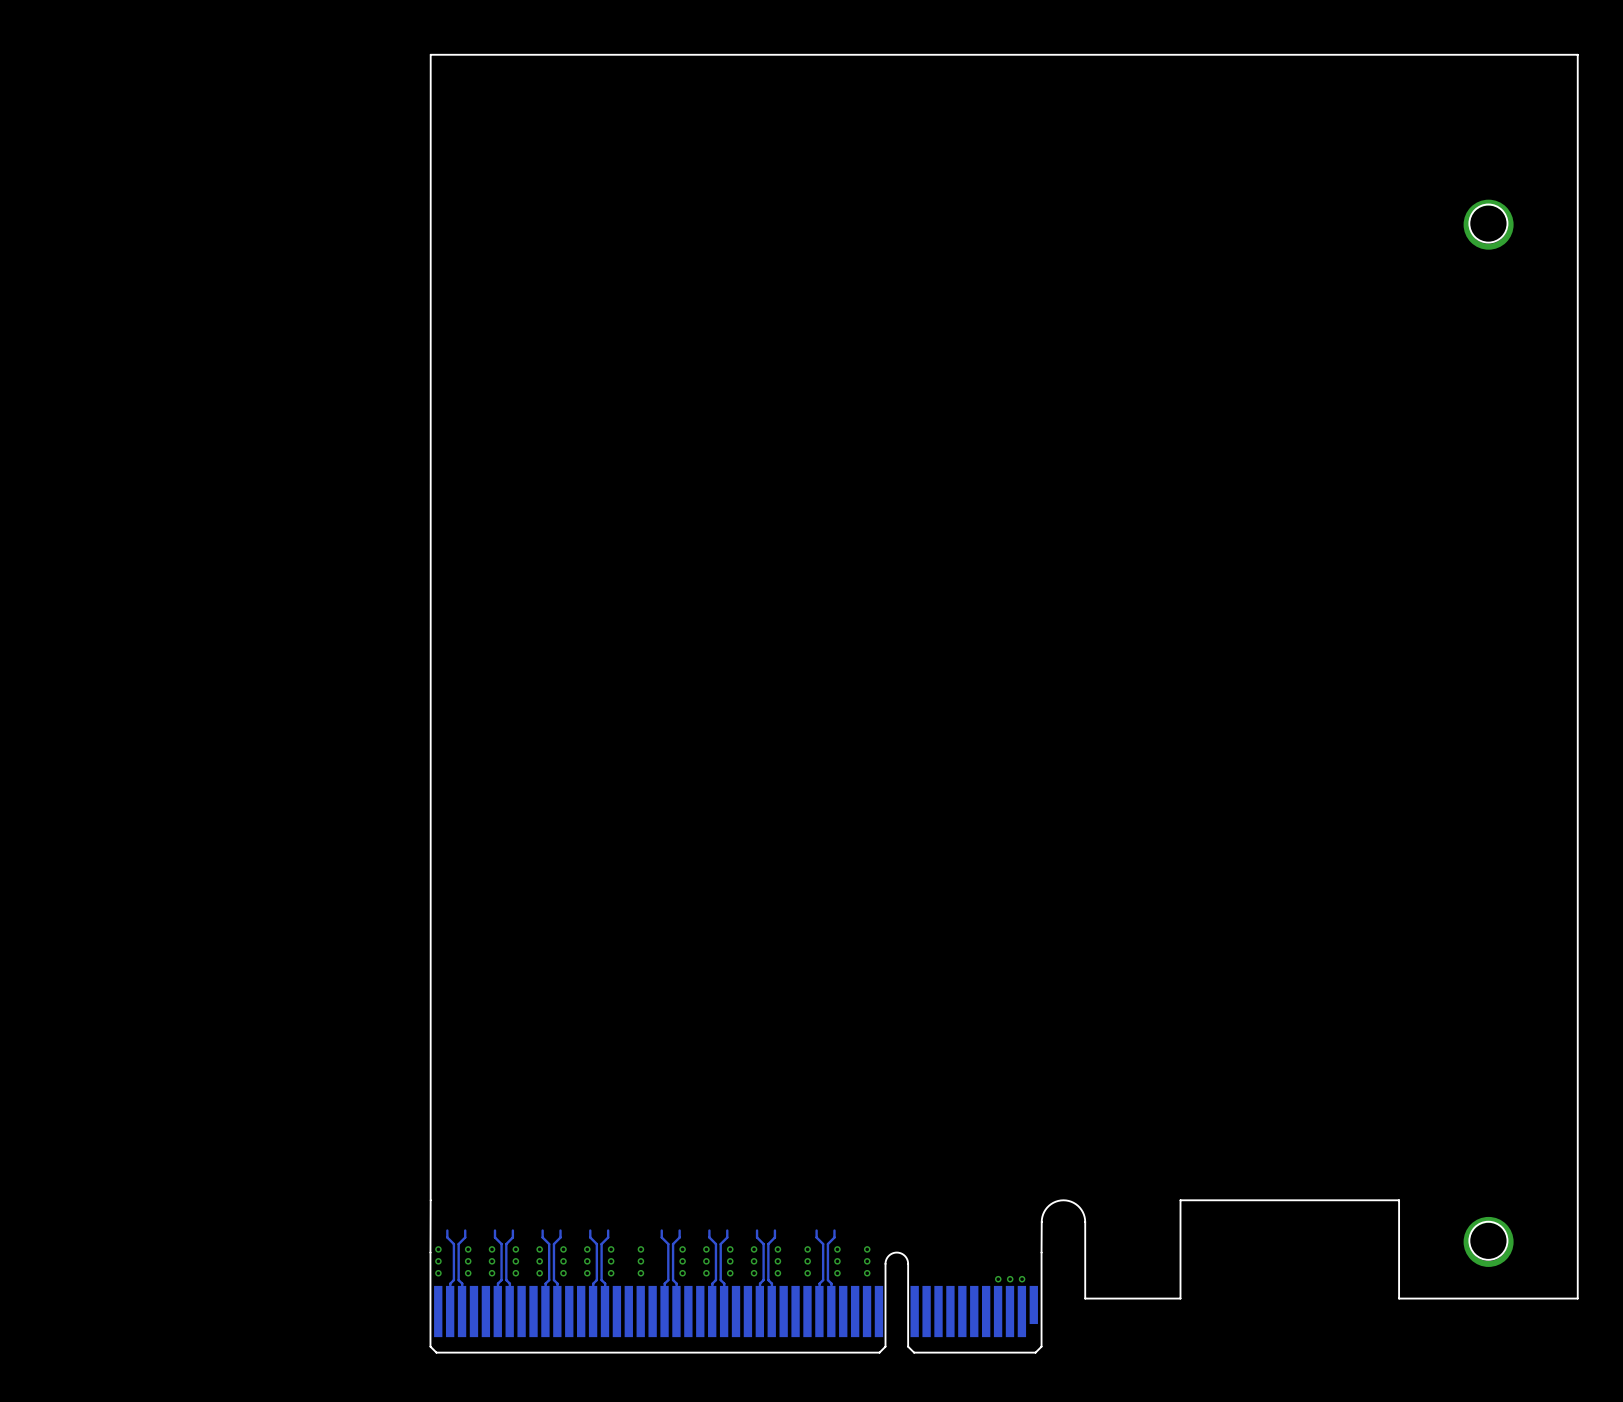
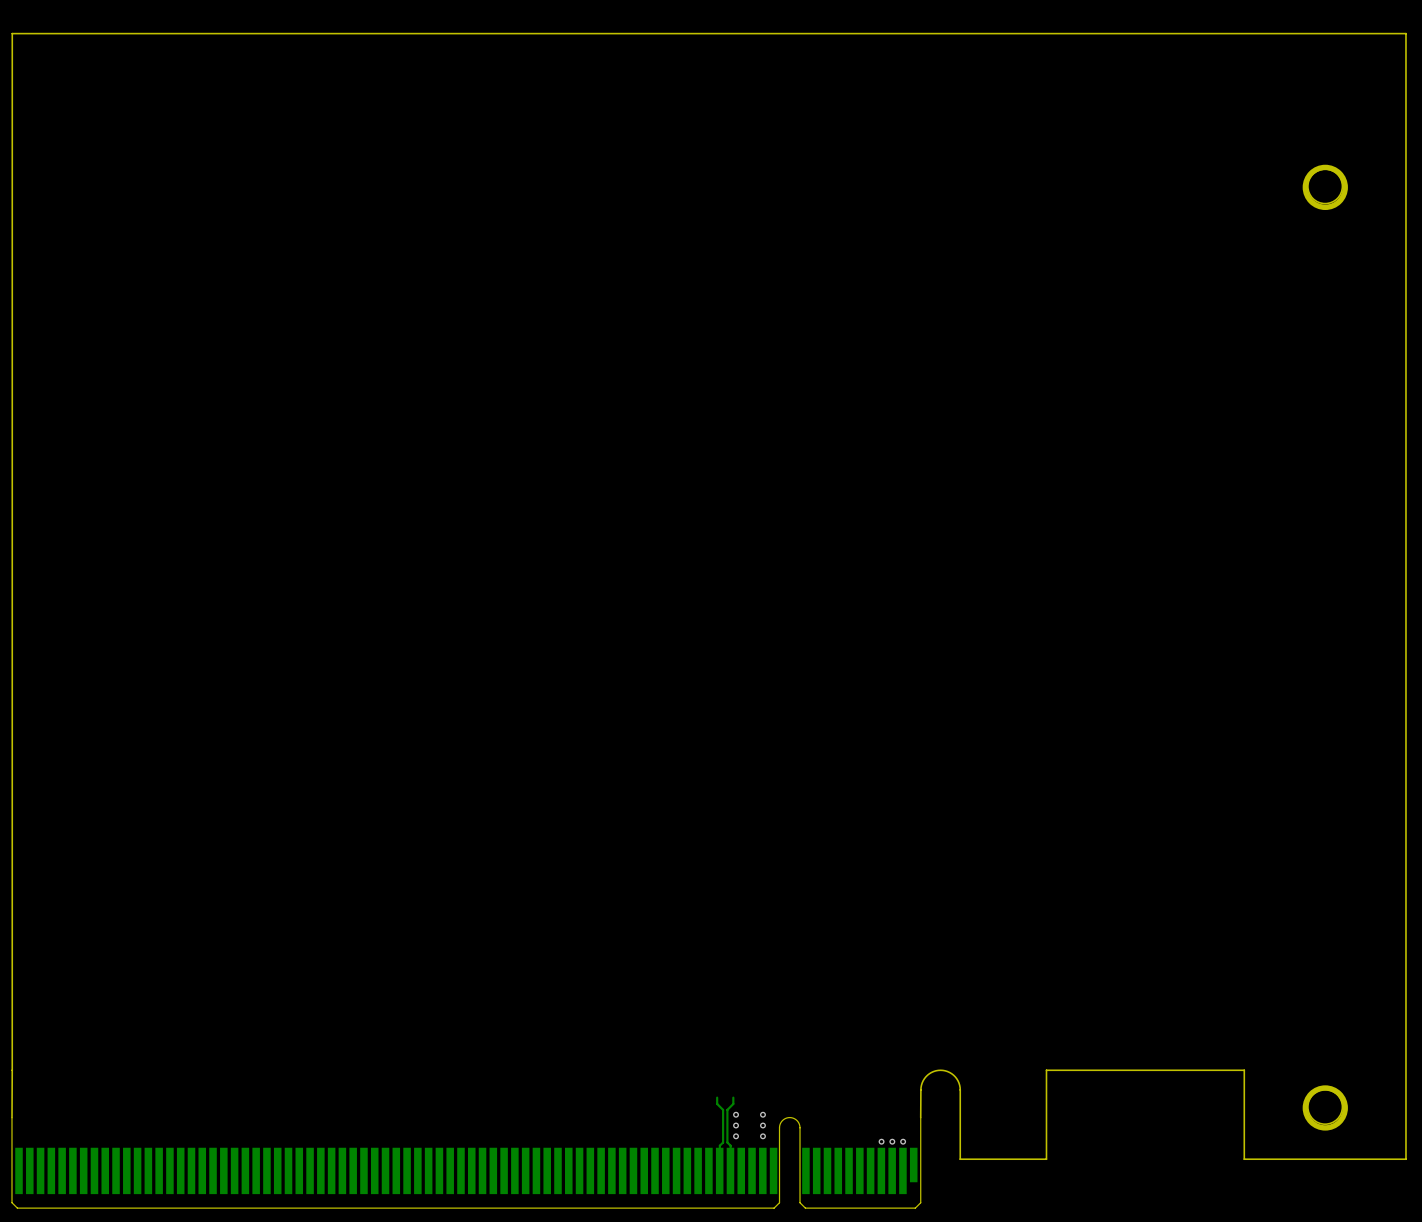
board edge: (430, 54) (430, 1252) -> (367, 33) (12, 33) (12, 1117)
track: (447, 1230) (447, 1237) (453, 1244) (453, 1280) (450, 1283) (450, 1310) -> none
track: (465, 1230) (465, 1237) (458, 1244) (458, 1280) (462, 1283) (462, 1310) -> none
track: (494, 1230) (494, 1237) (501, 1244) (501, 1280) (497, 1283) (497, 1310) -> none
track: (512, 1230) (512, 1237) (506, 1244) (506, 1280) (509, 1283) (509, 1310) -> none
track: (542, 1230) (542, 1237) (549, 1244) (549, 1280) (545, 1283) (545, 1310) -> none
track: (560, 1230) (560, 1237) (553, 1244) (553, 1280) (557, 1283) (557, 1310) -> none
track: (590, 1230) (590, 1237) (596, 1244) (596, 1280) (593, 1283) (593, 1310) -> none
track: (608, 1230) (608, 1237) (601, 1244) (601, 1280) (605, 1283) (605, 1310) -> none
track: (661, 1230) (661, 1237) (668, 1244) (668, 1280) (664, 1283) (664, 1310) -> none
track: (679, 1230) (679, 1237) (673, 1244) (673, 1280) (676, 1283) (676, 1310) -> none
track: (709, 1230) (709, 1237) (715, 1244) (715, 1280) (712, 1283) (712, 1310) -> none
track: (727, 1230) (727, 1237) (720, 1244) (720, 1280) (724, 1283) (724, 1310) -> none
track: (757, 1230) (757, 1237) (763, 1244) (763, 1280) (760, 1283) (760, 1310) -> none
track: (774, 1230) (774, 1237) (768, 1244) (768, 1280) (771, 1283) (771, 1310) -> none
via: (438, 1249) -> none
via: (468, 1249) -> none
via: (492, 1249) -> none
via: (515, 1249) -> none
via: (539, 1249) -> none
via: (563, 1249) -> none
via: (587, 1249) -> none
via: (611, 1249) -> none
via: (640, 1249) -> none
via: (682, 1249) -> none
via: (706, 1249) -> none
via: (730, 1249) -> none
via: (754, 1249) -> none
via: (777, 1249) -> none
via: (807, 1249) -> none
via: (438, 1261) -> none
via: (468, 1261) -> none
via: (492, 1261) -> none
via: (515, 1261) -> none
via: (539, 1261) -> none
via: (563, 1261) -> none
via: (587, 1261) -> none
via: (611, 1261) -> none
via: (640, 1261) -> none
via: (682, 1261) -> none
via: (706, 1261) -> none
via: (730, 1261) -> none
via: (754, 1261) -> none
via: (777, 1261) -> none
via: (807, 1261) -> none
via: (438, 1273) -> none
via: (468, 1273) -> none
via: (492, 1273) -> none
via: (515, 1273) -> none
via: (539, 1273) -> none
via: (563, 1273) -> none
via: (587, 1273) -> none
via: (611, 1273) -> none
via: (640, 1273) -> none
via: (682, 1273) -> none
via: (706, 1273) -> none
via: (730, 1273) -> none
via: (754, 1273) -> none
via: (777, 1273) -> none
via: (807, 1273) -> none
part: none -> (466, 1162)
part: (736, 1302) -> none

